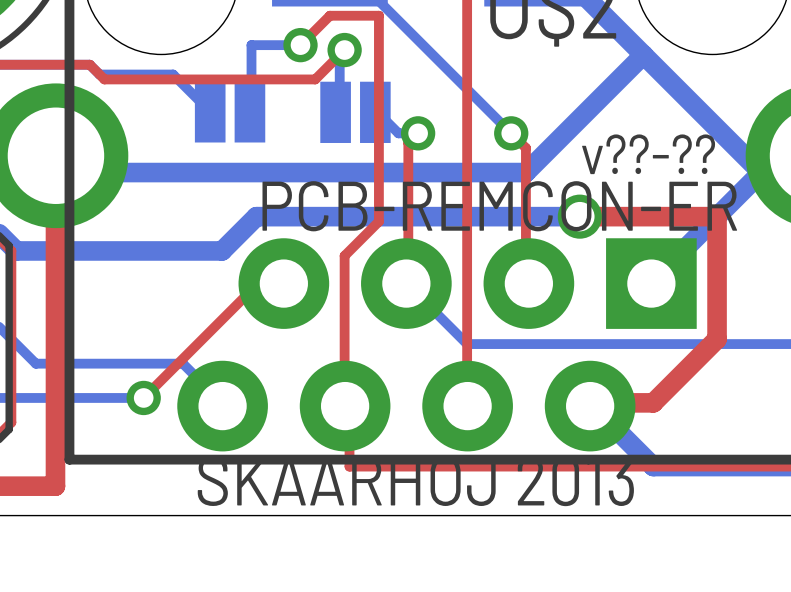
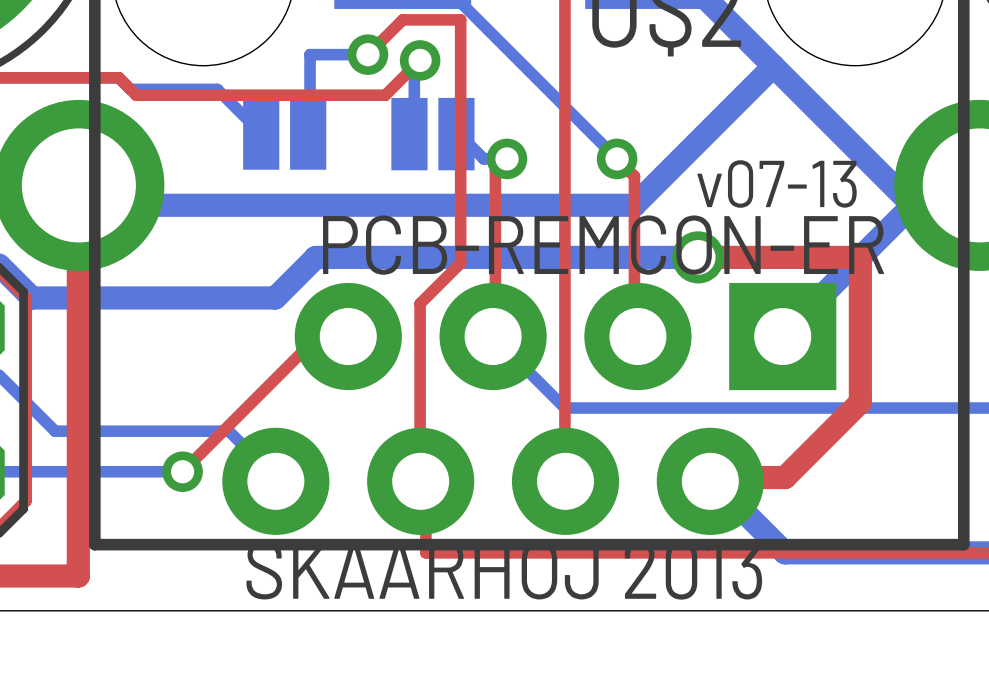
text: v??-?? (648, 154) -> v07-13 (777, 183)

